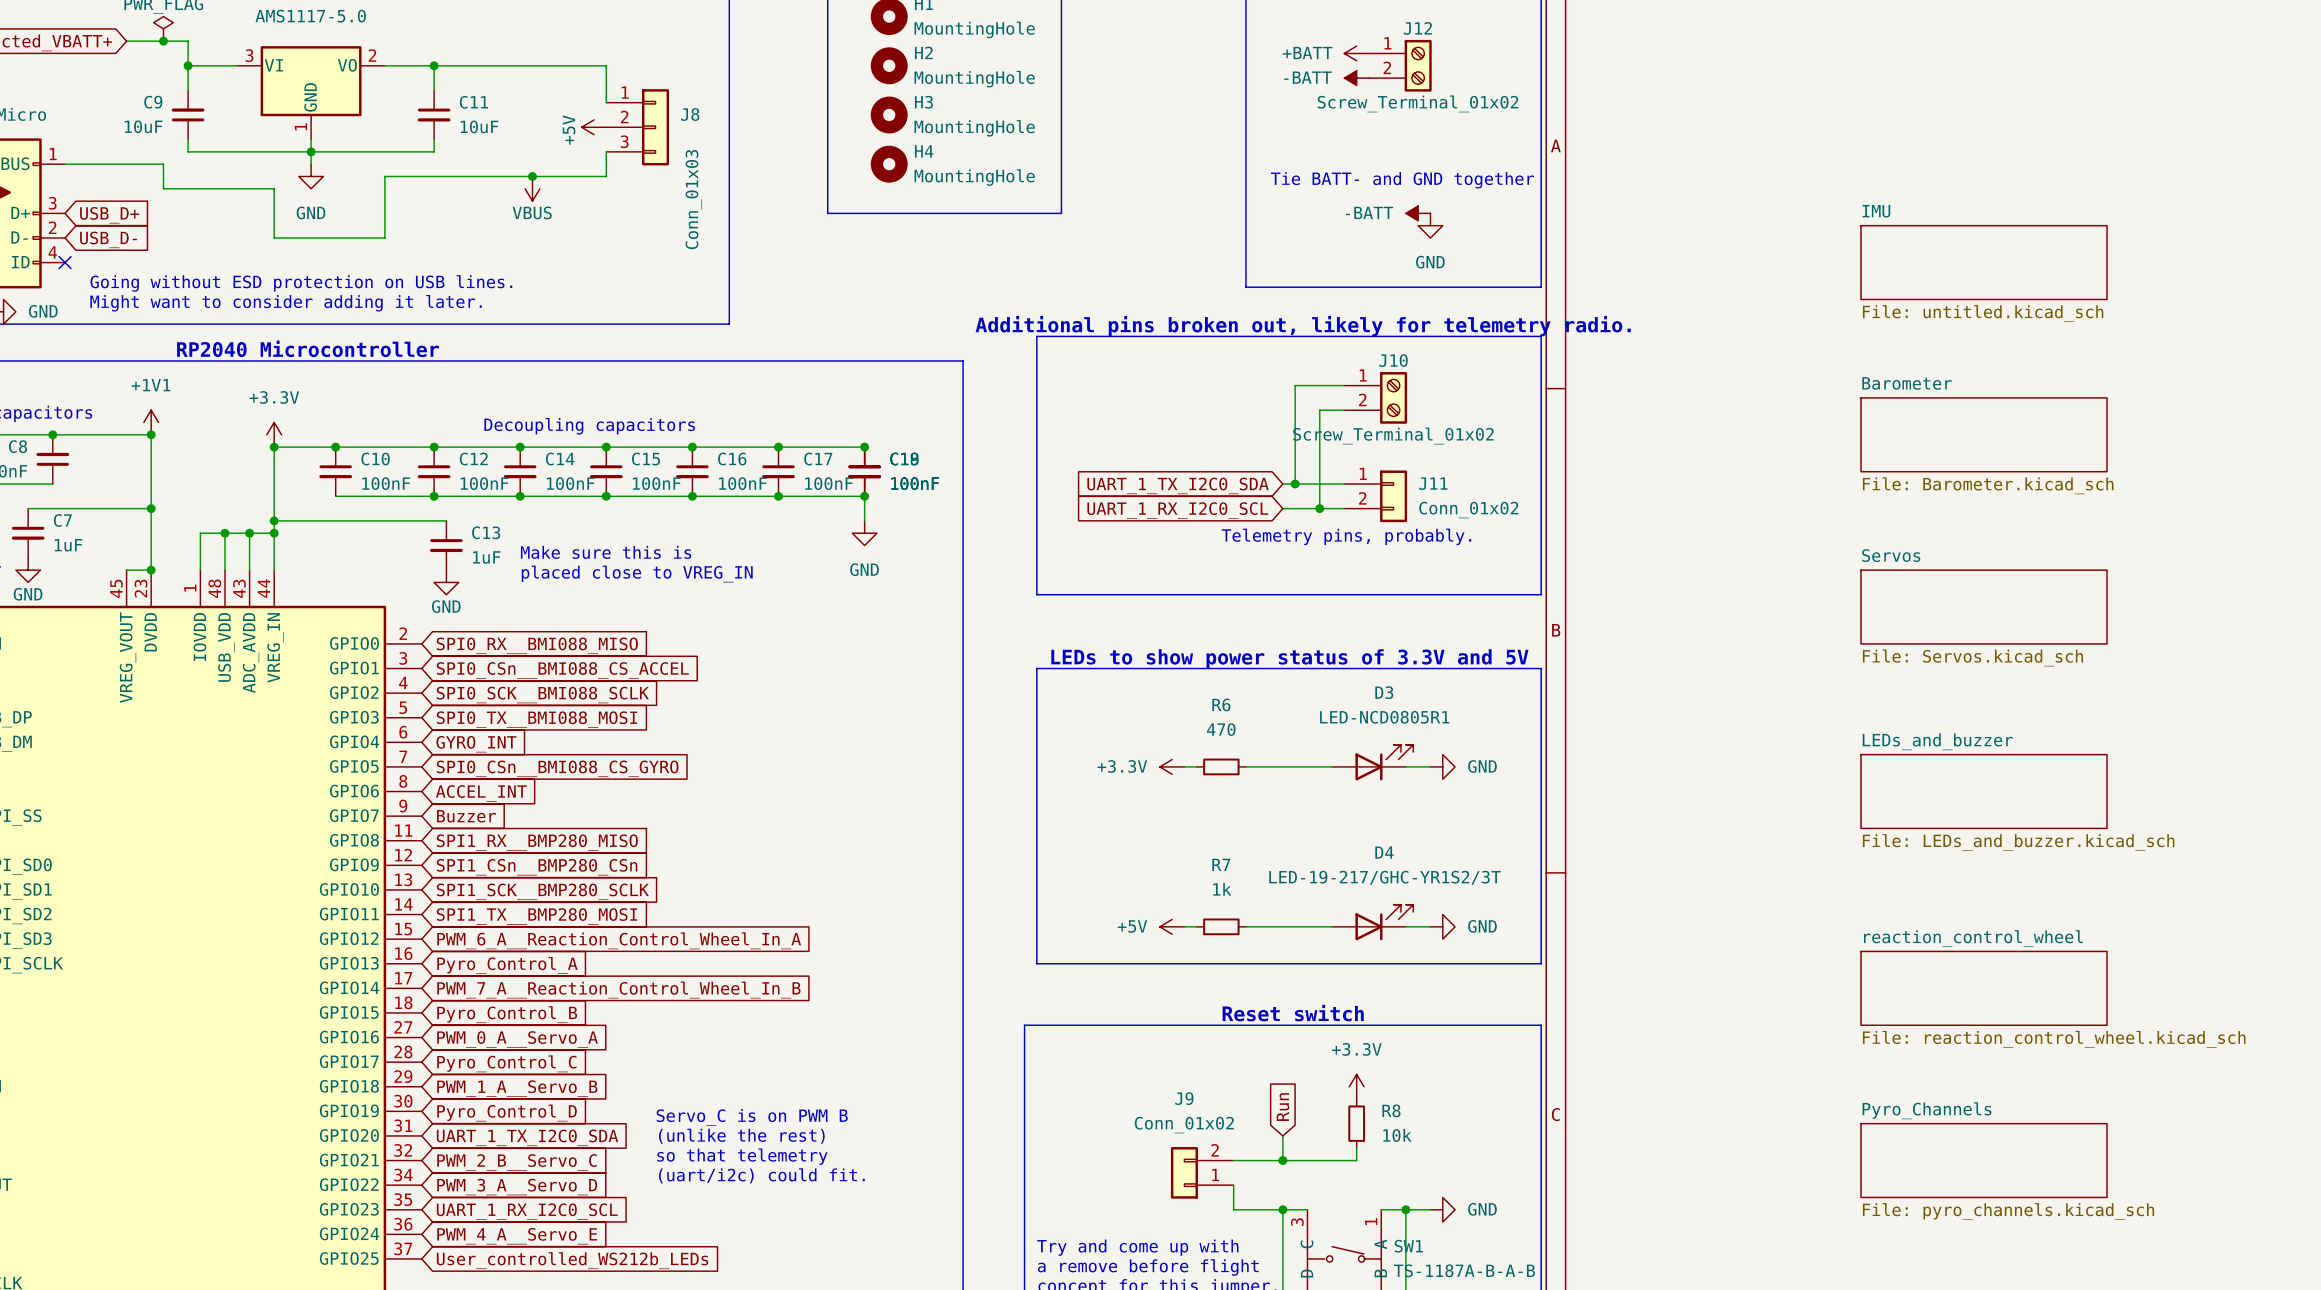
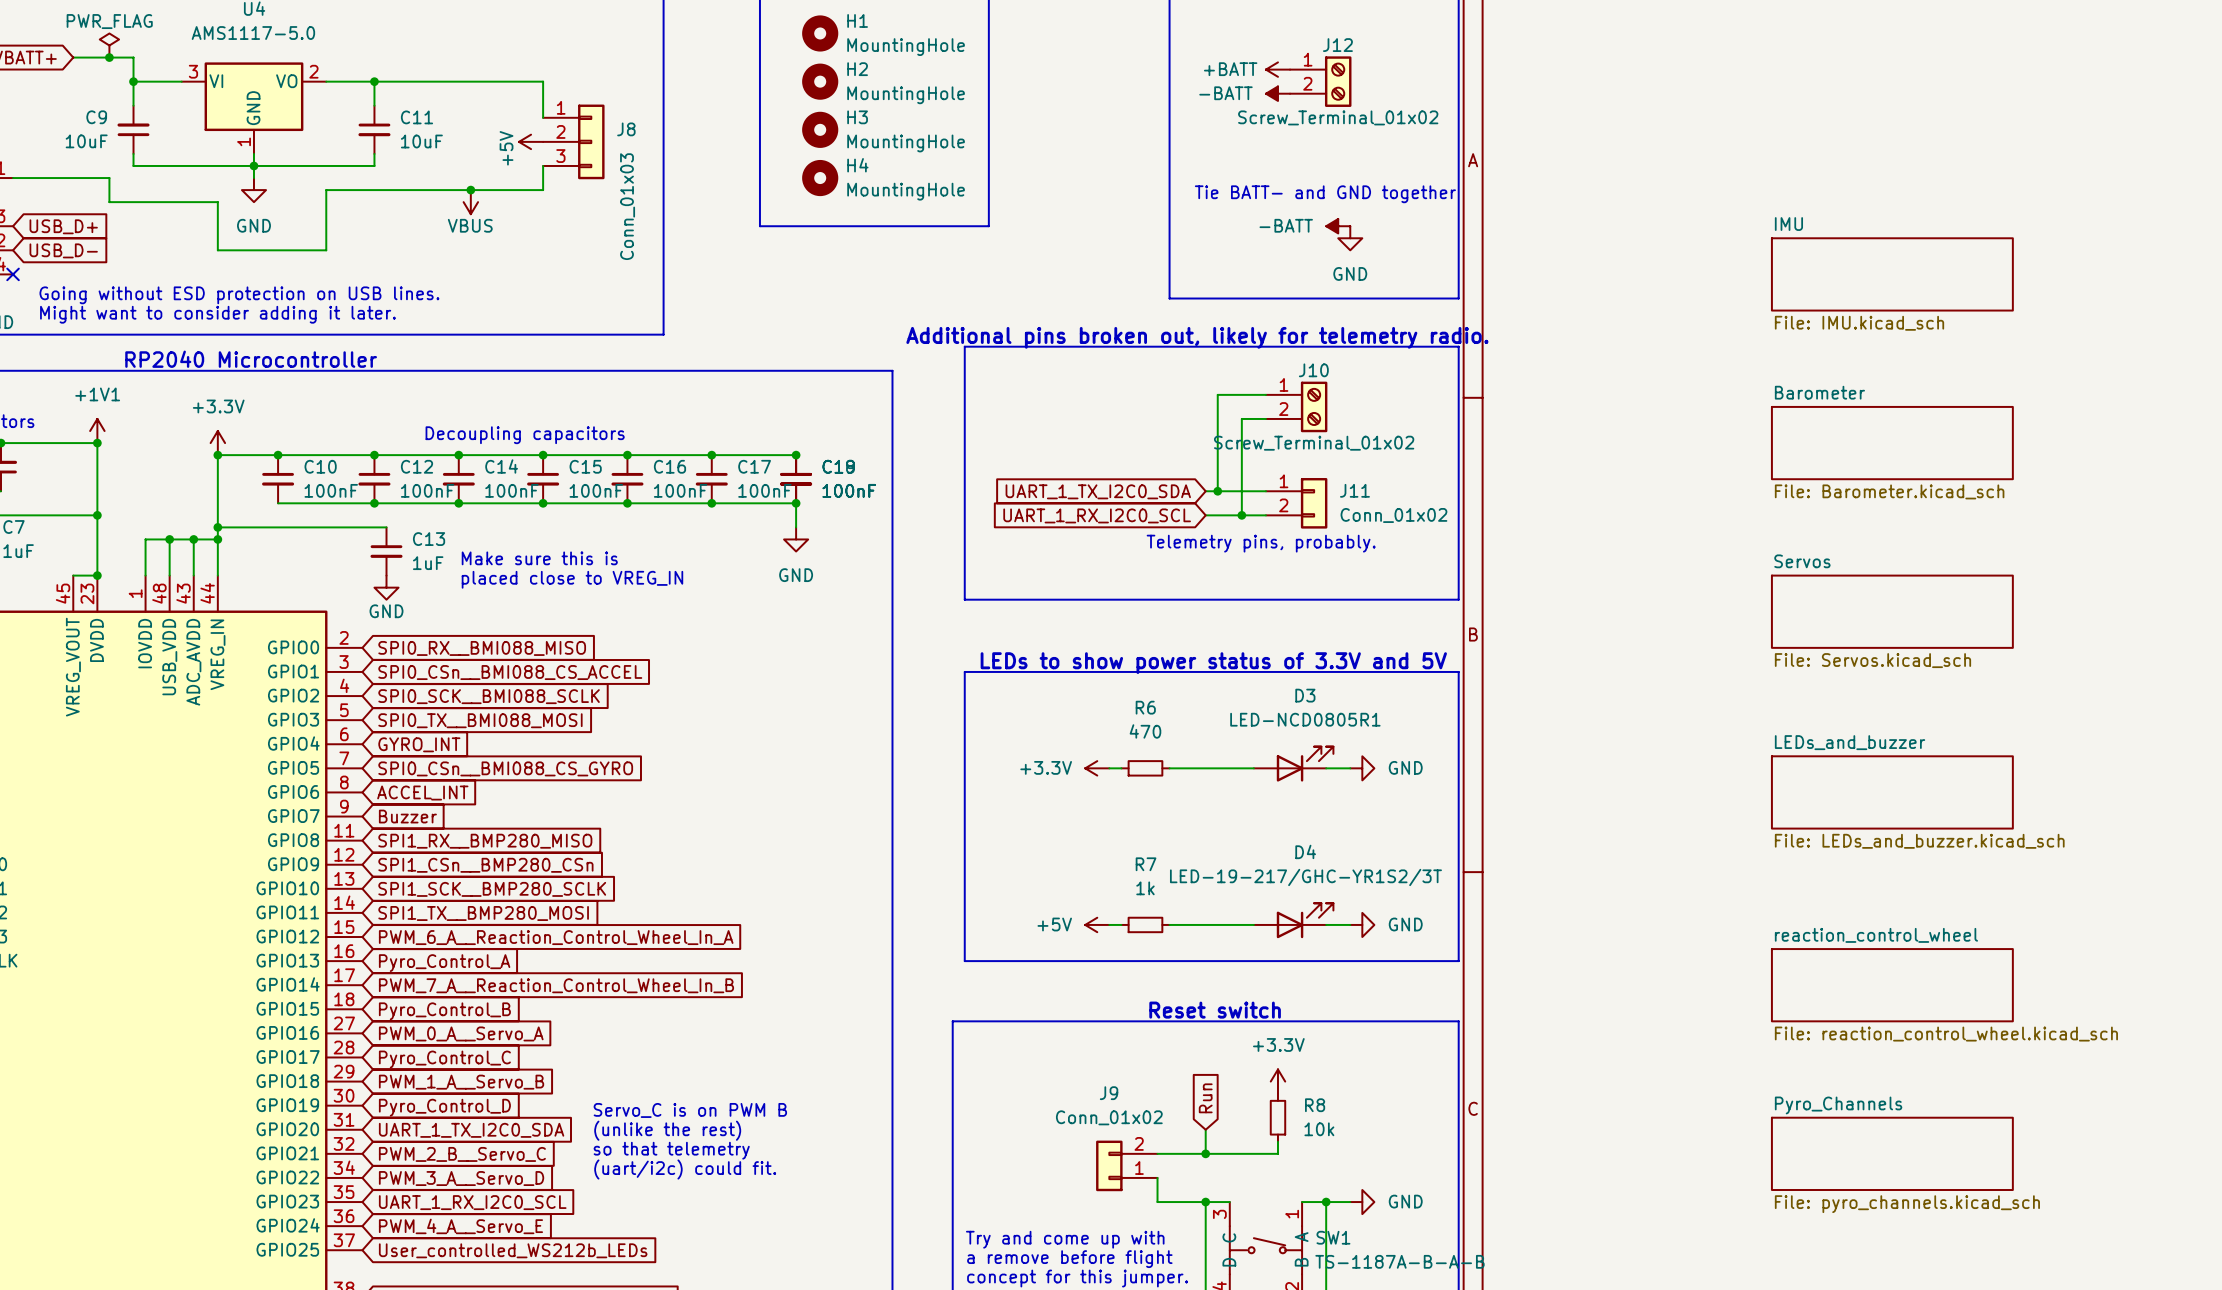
sheet IMU value: File: untitled.kicad_sch (1983, 313) -> File: IMU.kicad_sch (1859, 323)

